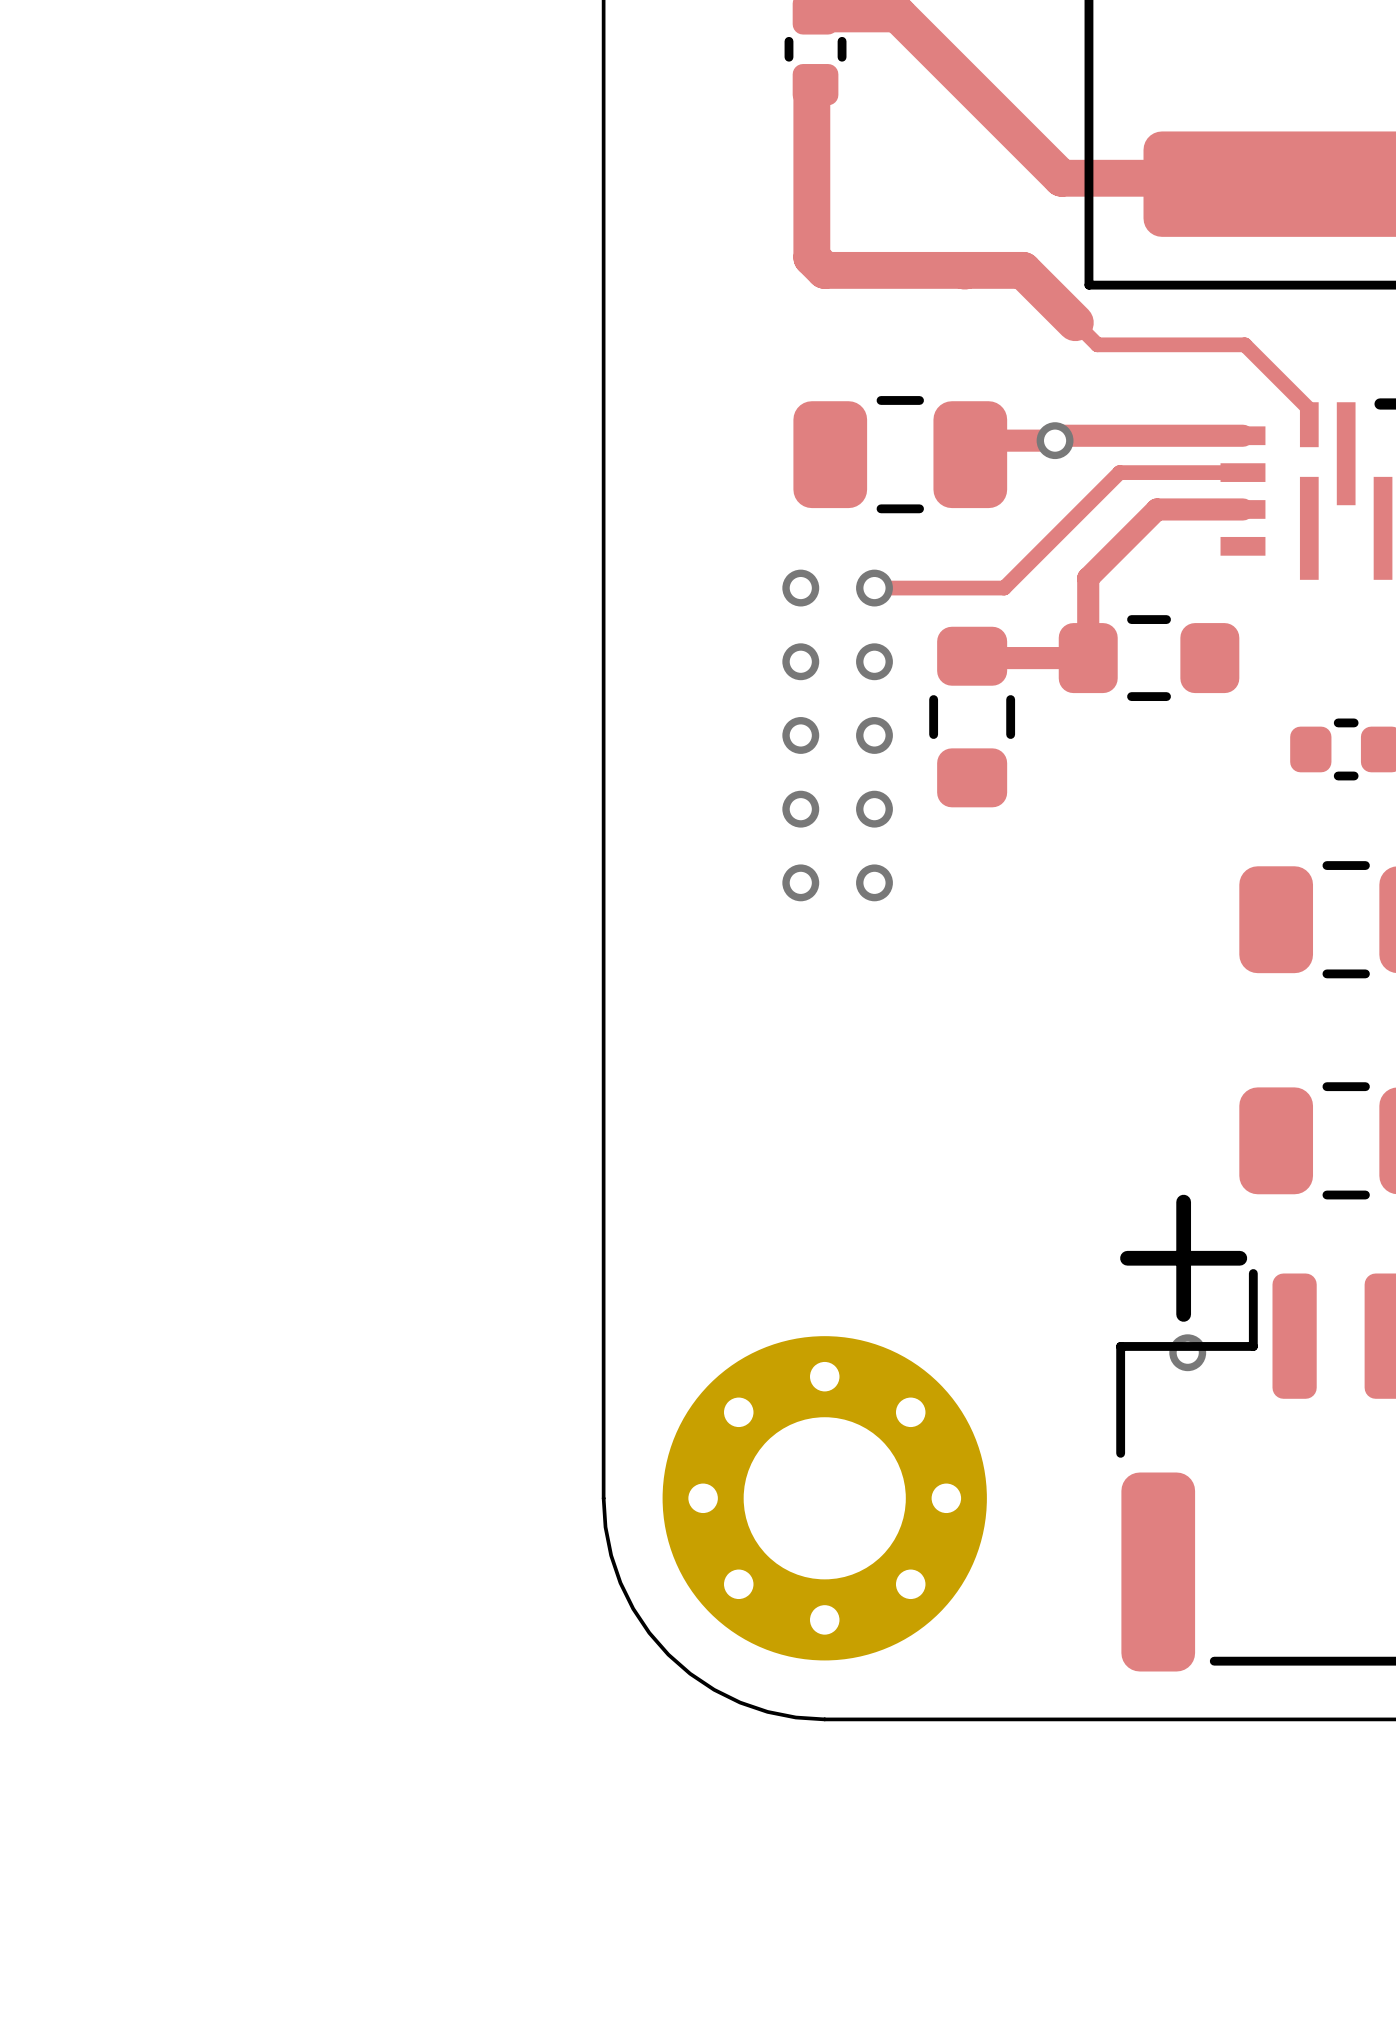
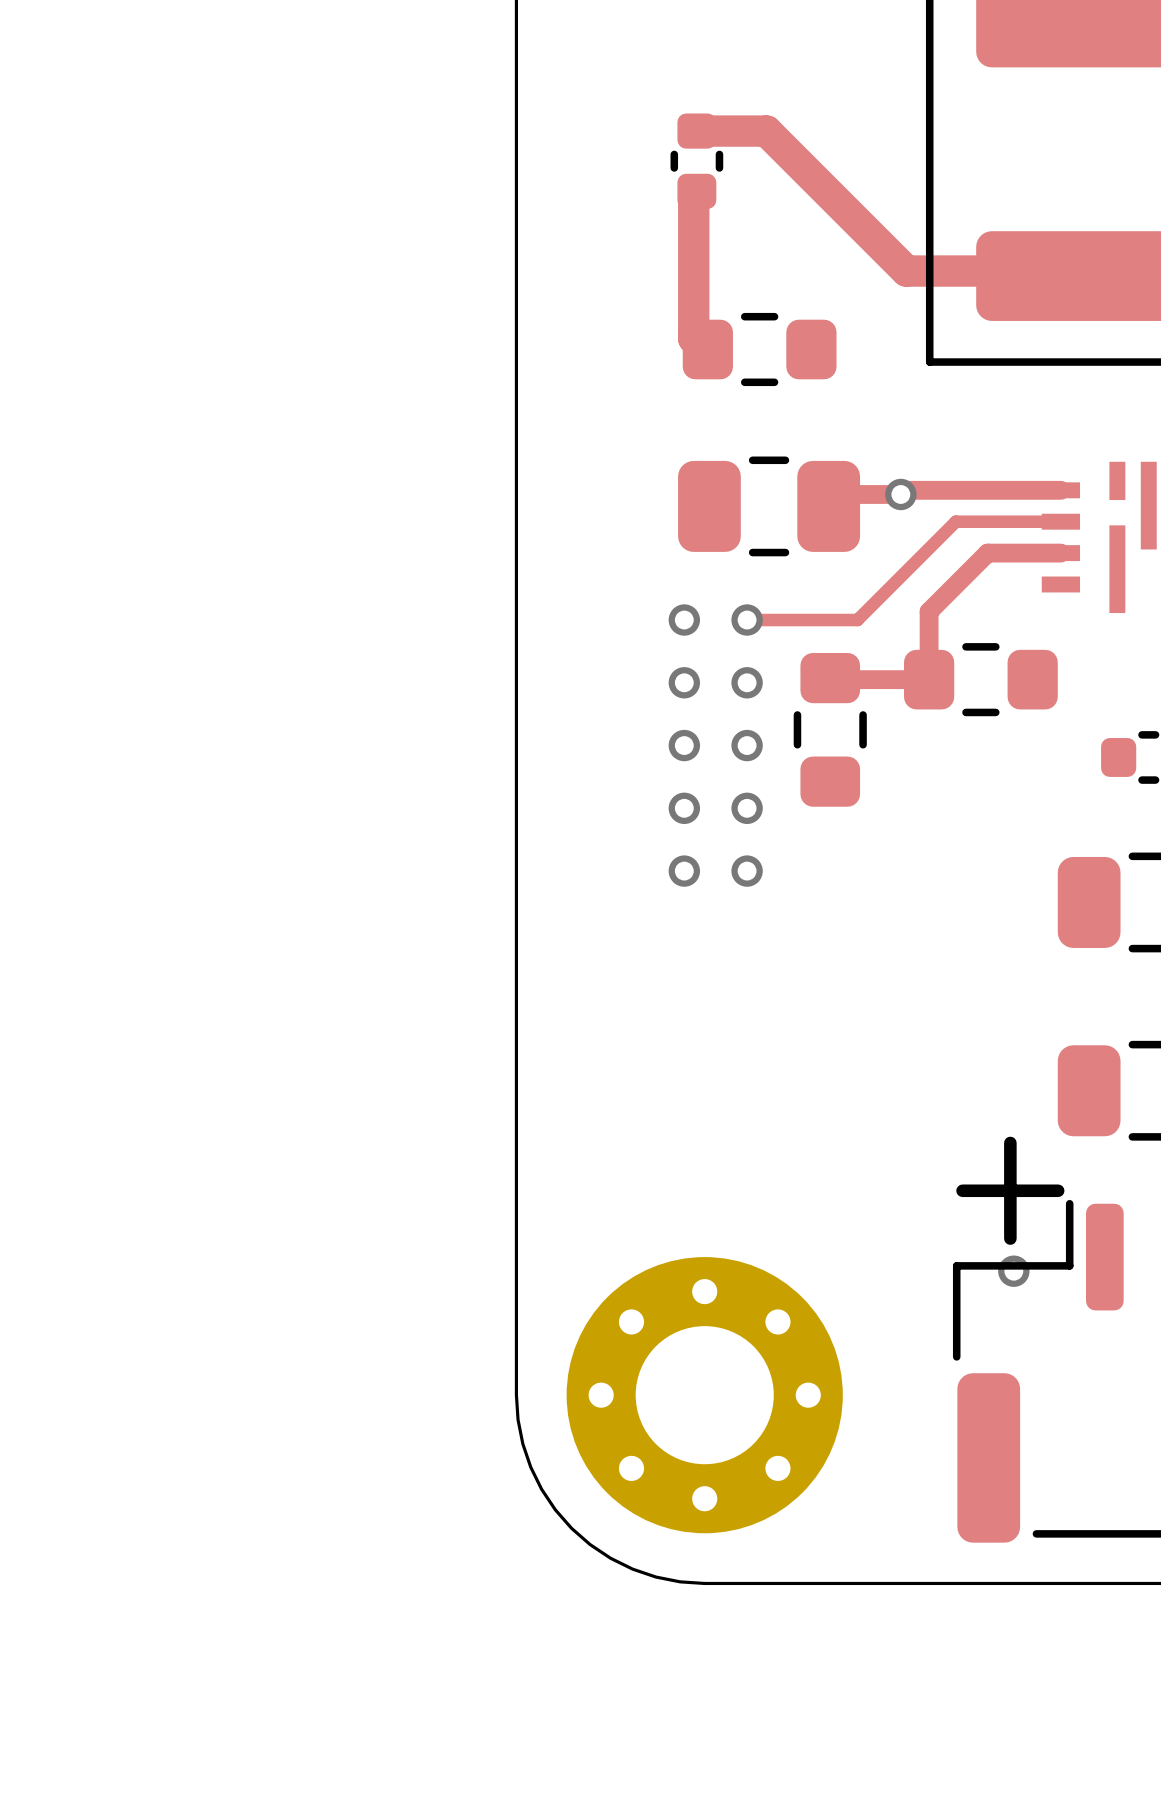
track: (824, 270) (1023, 270) (1097, 344) (1244, 344) (1309, 409) (1309, 424) -> none
part: none -> (759, 349)

